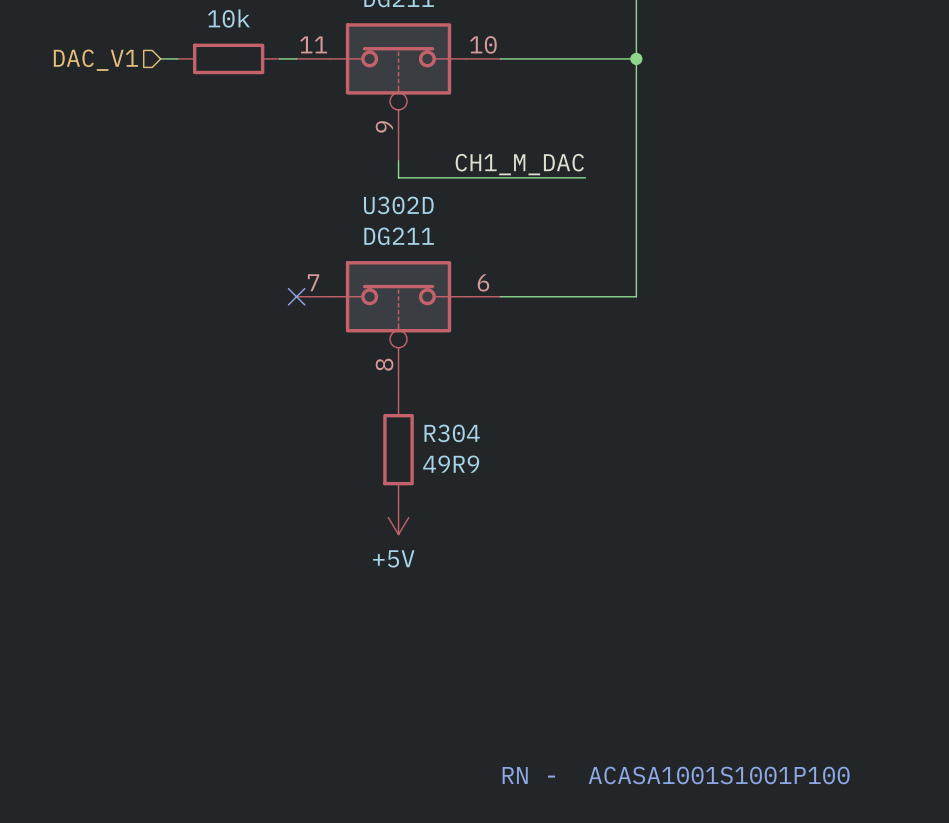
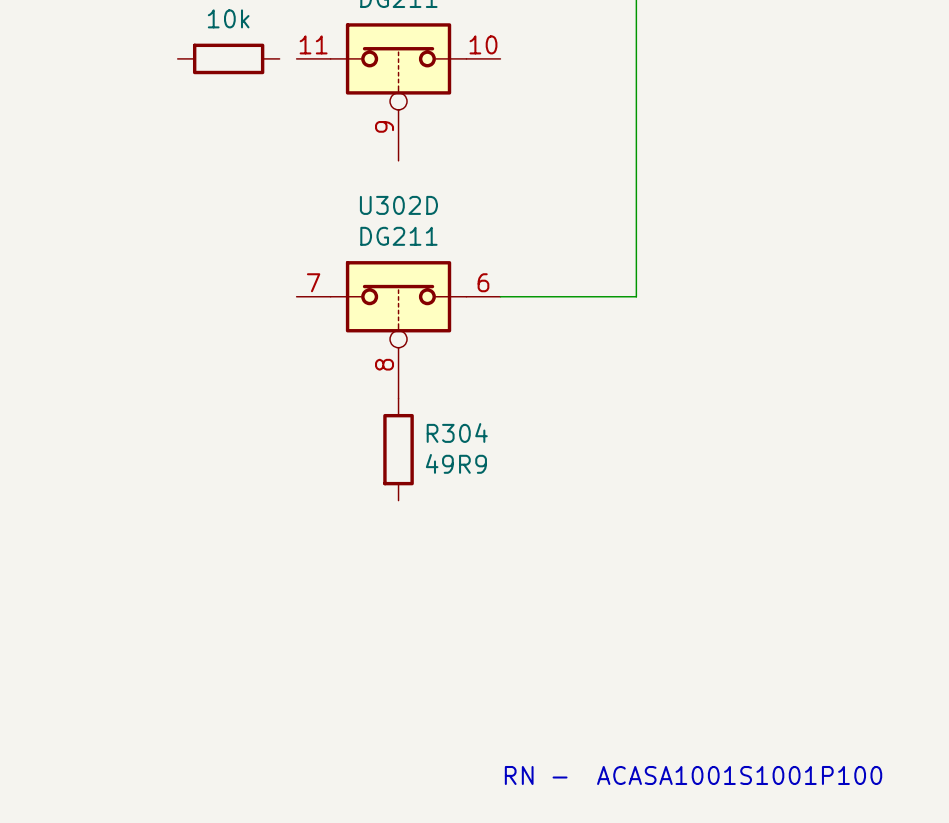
wire: (160, 58) (177, 58) -> none
wire: (279, 58) (296, 58) -> none
wire: (500, 58) (636, 58) -> none
junction: (636, 58) -> none
hierarchical label: DAC_V1 (95, 60) -> none
wire: (398, 160) (398, 177) (585, 177) -> none
label: CH1_M_DAC (519, 164) -> none
no-connect mark: (296, 296) -> none
power symbol: +5V (398, 517) -> none

